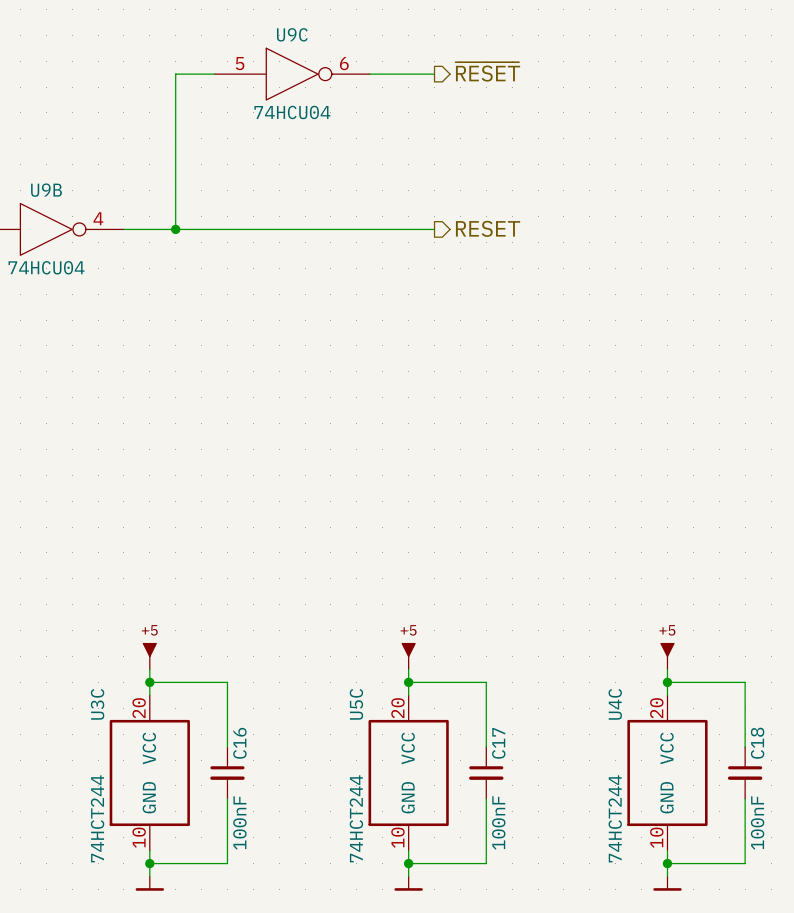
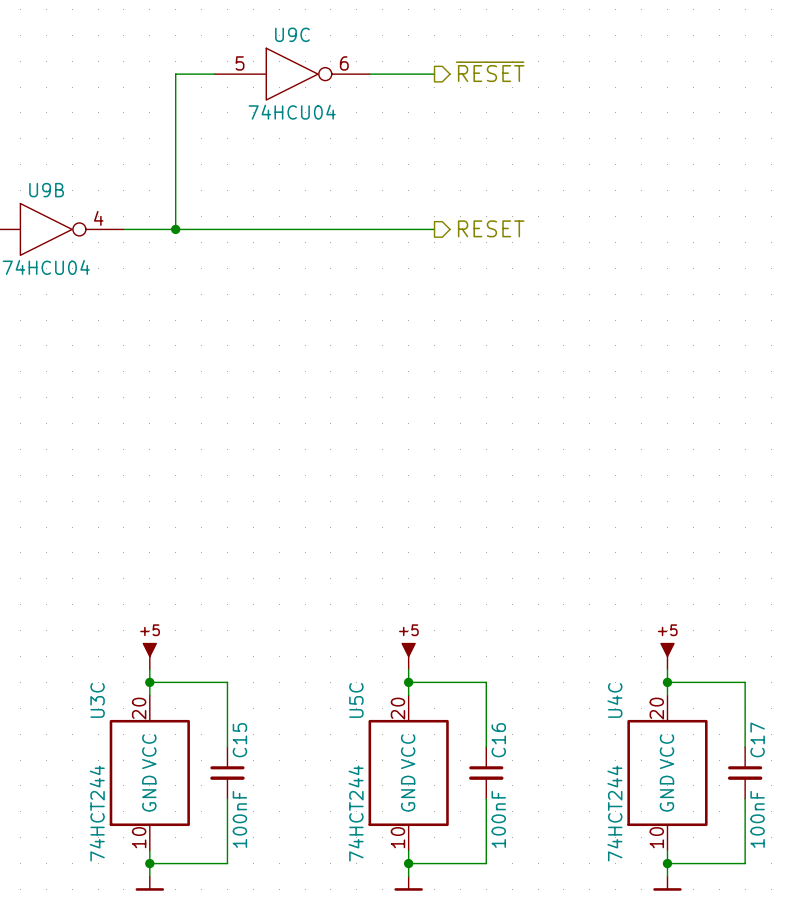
C16 name: C16 (239, 743) -> C15 (239, 740)
C17 name: C17 (498, 743) -> C16 (498, 740)
C18 name: C18 (757, 743) -> C17 (757, 739)

